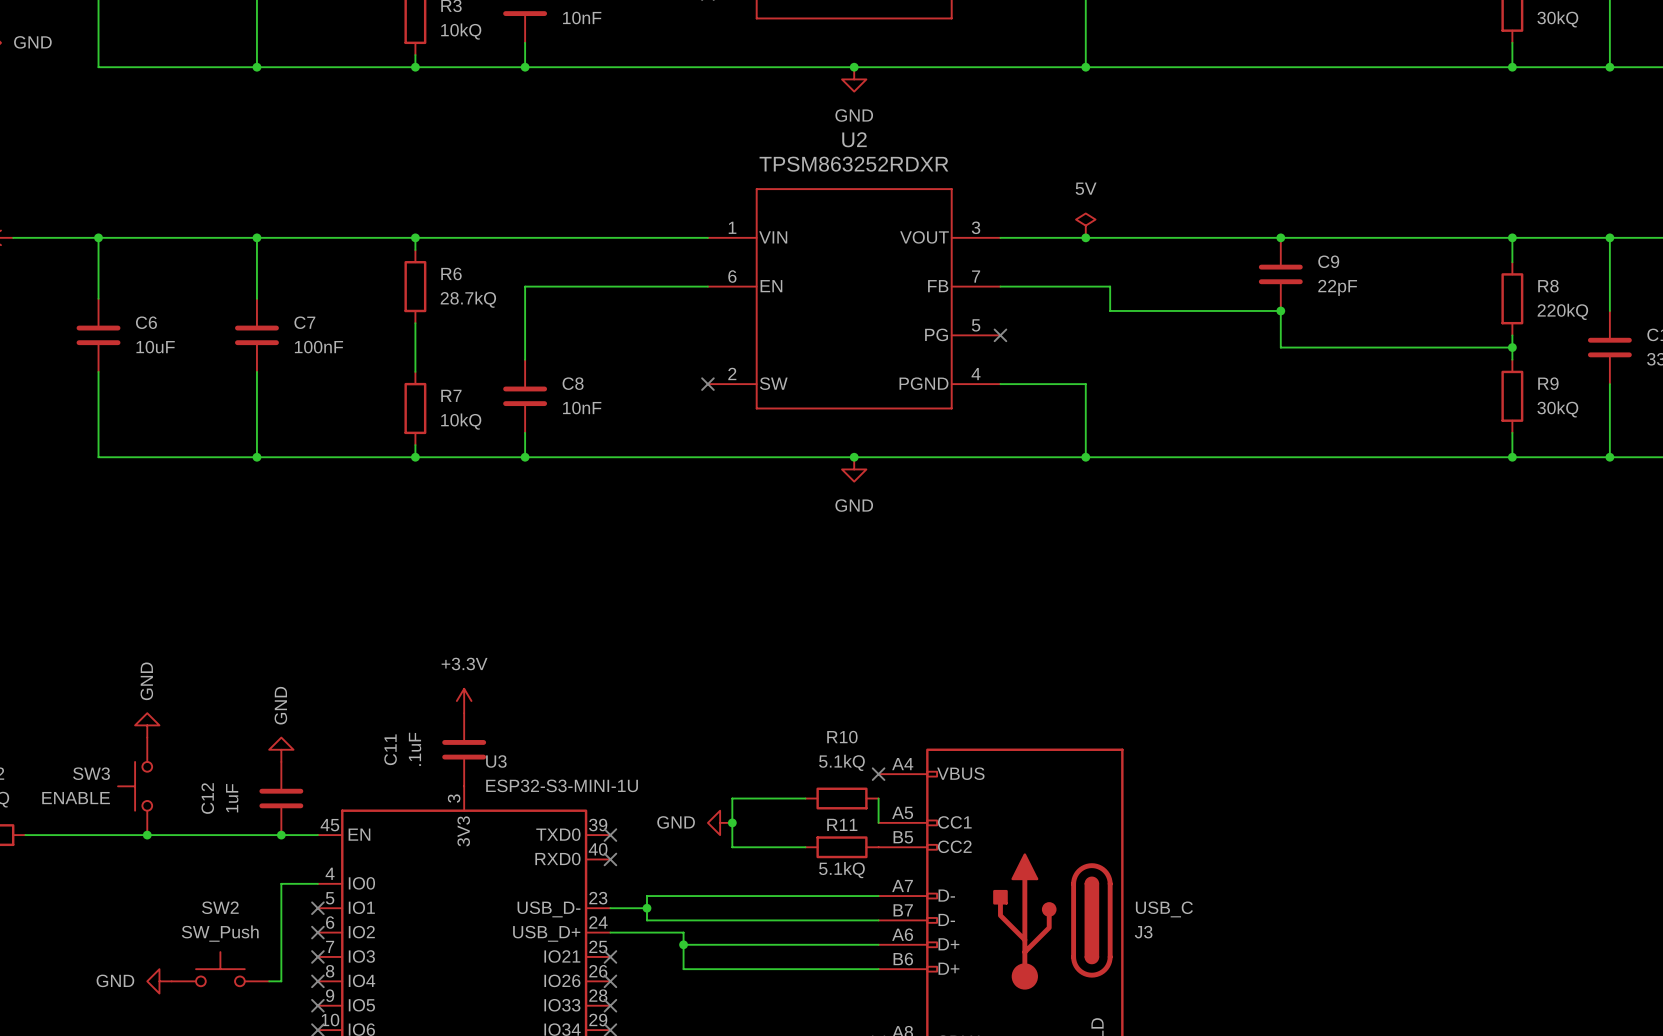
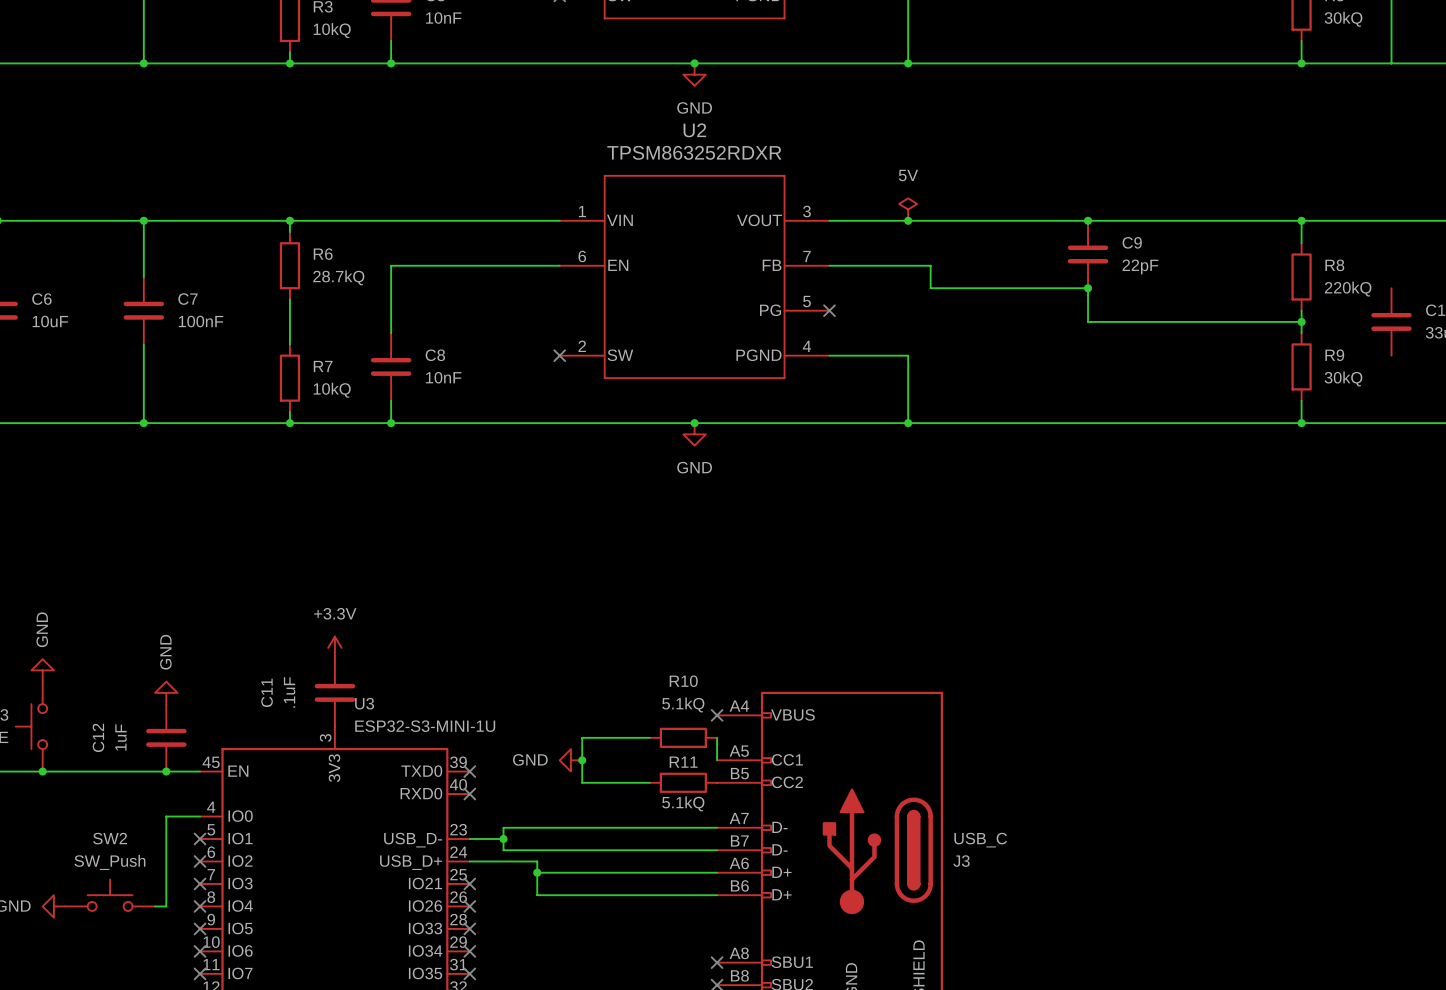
junction: (1609, 67) -> none
wire: (1609, 237) (1609, 310) -> none
junction: (1609, 237) -> none
wire: (1609, 384) (1609, 457) -> none
junction: (1609, 457) -> none

